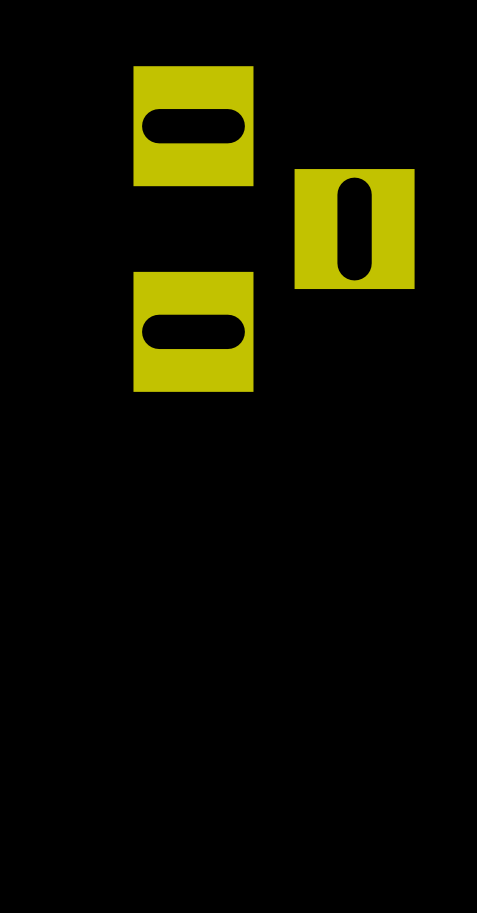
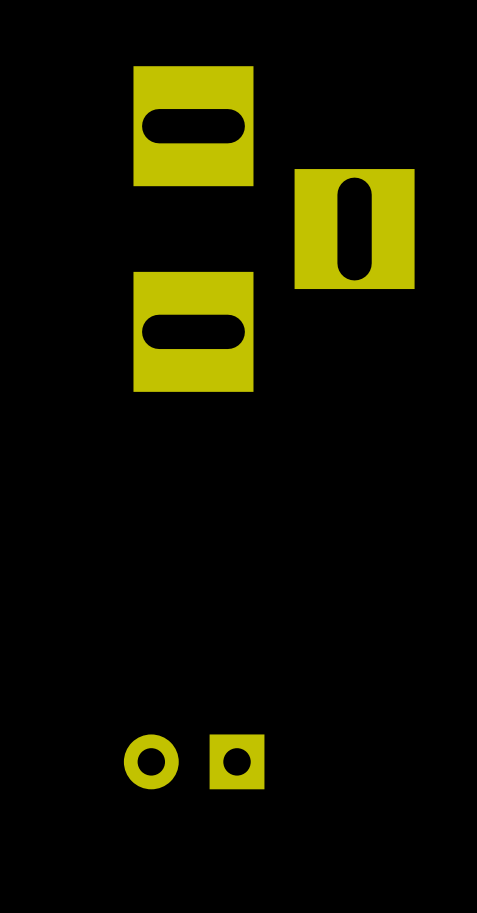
part: none -> (194, 761)

